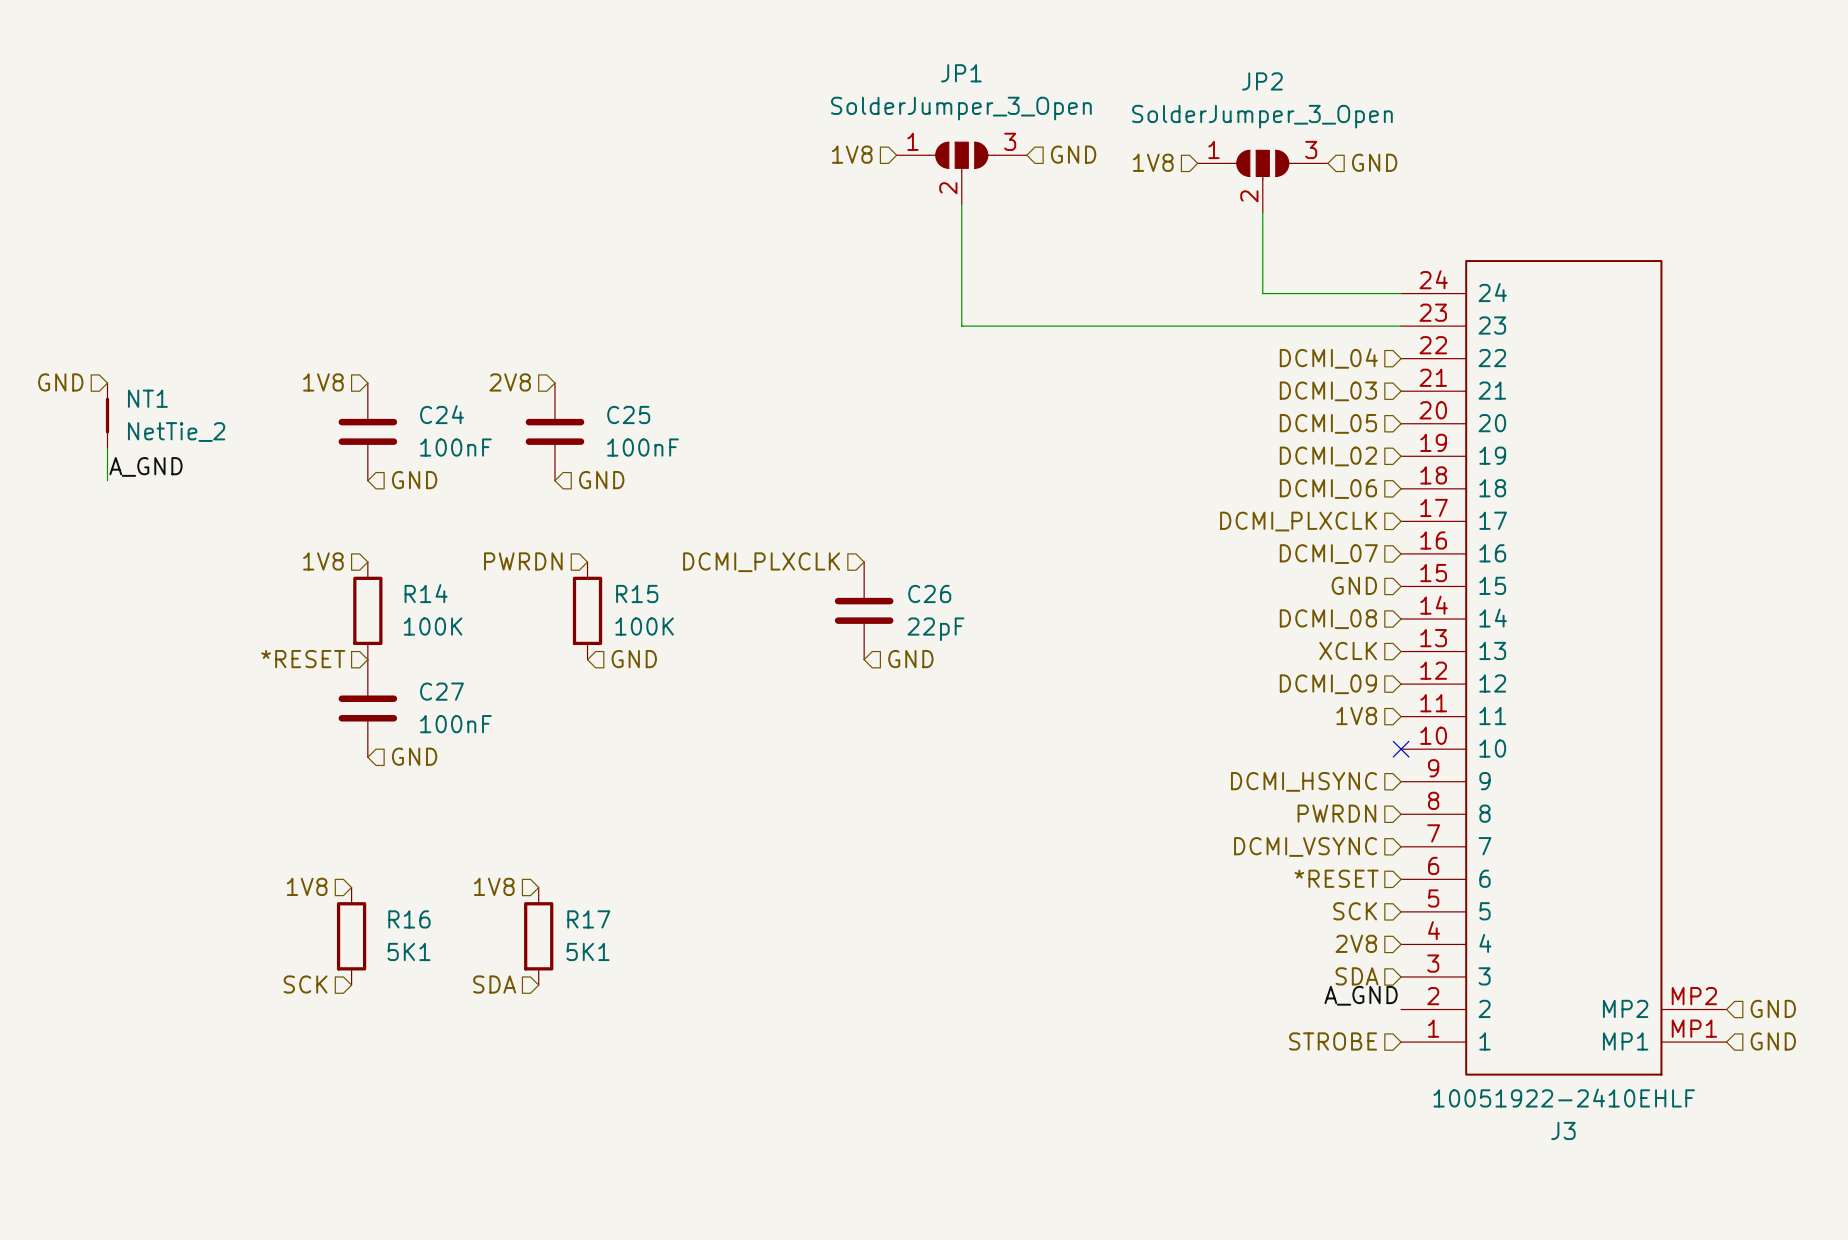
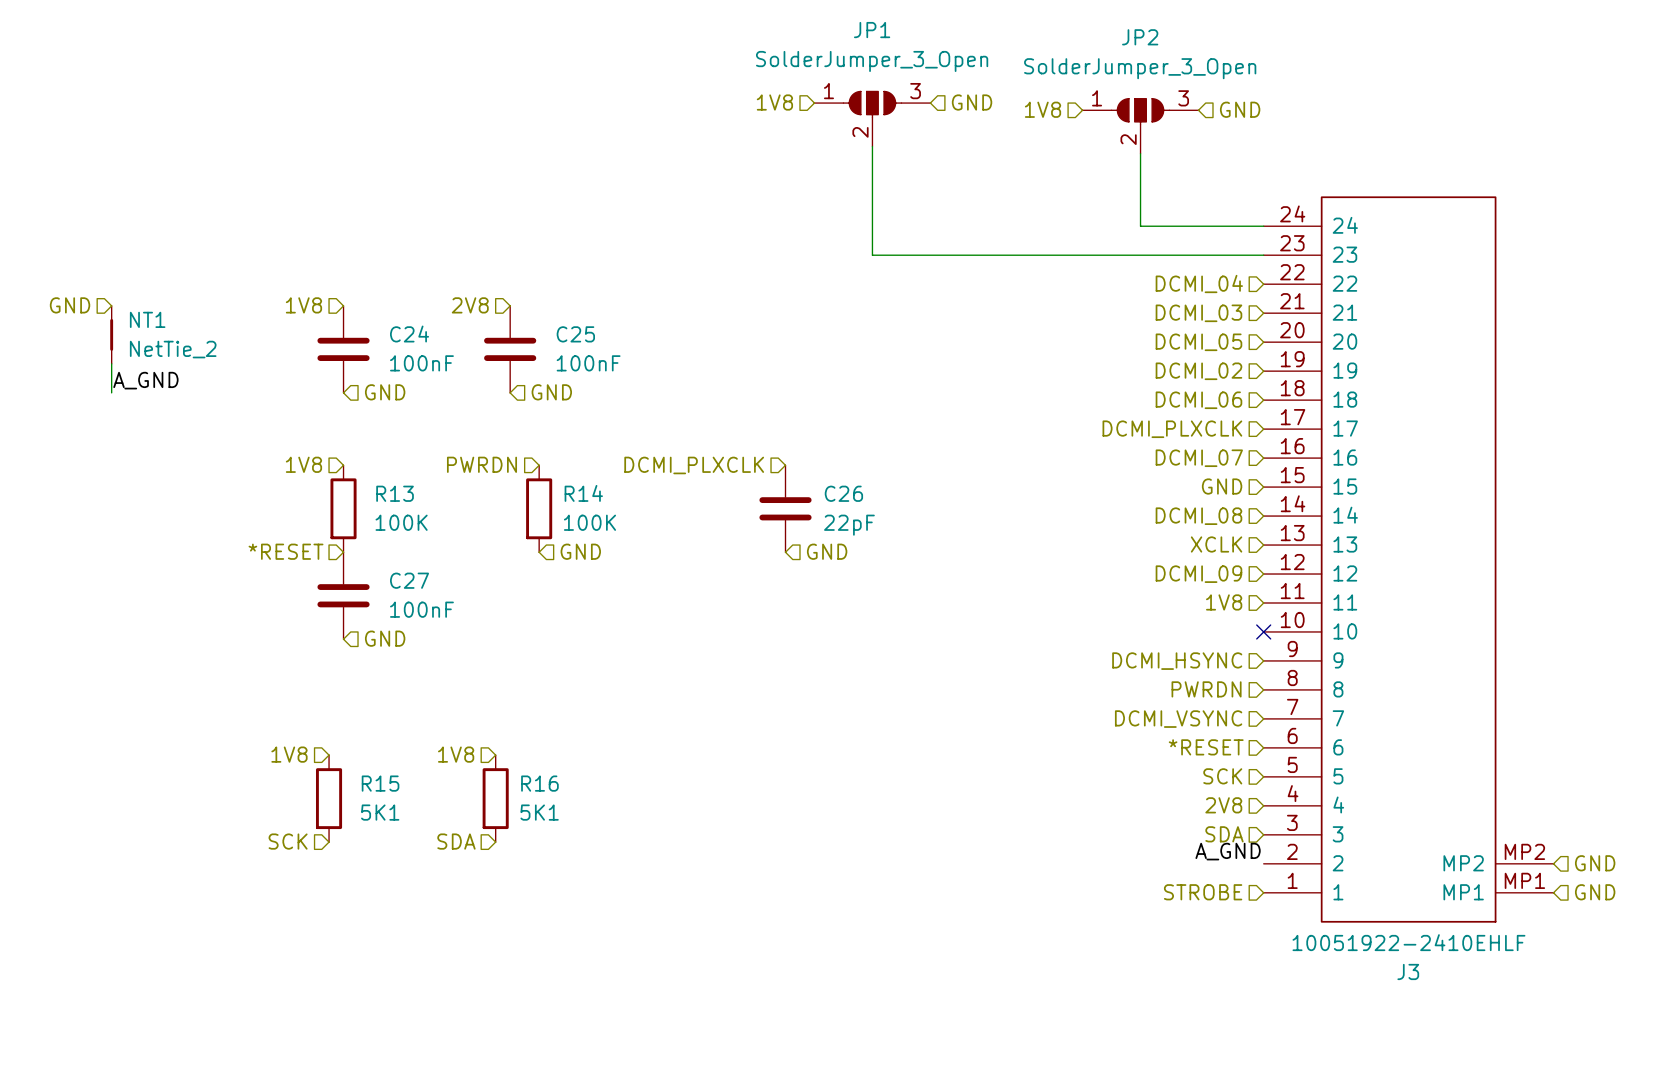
R14 name: R14 (426, 593) -> R13 (395, 493)
R15 name: R15 (637, 593) -> R14 (583, 493)
R16 name: R16 (409, 919) -> R15 (380, 783)
R17 name: R17 (588, 919) -> R16 (539, 783)

